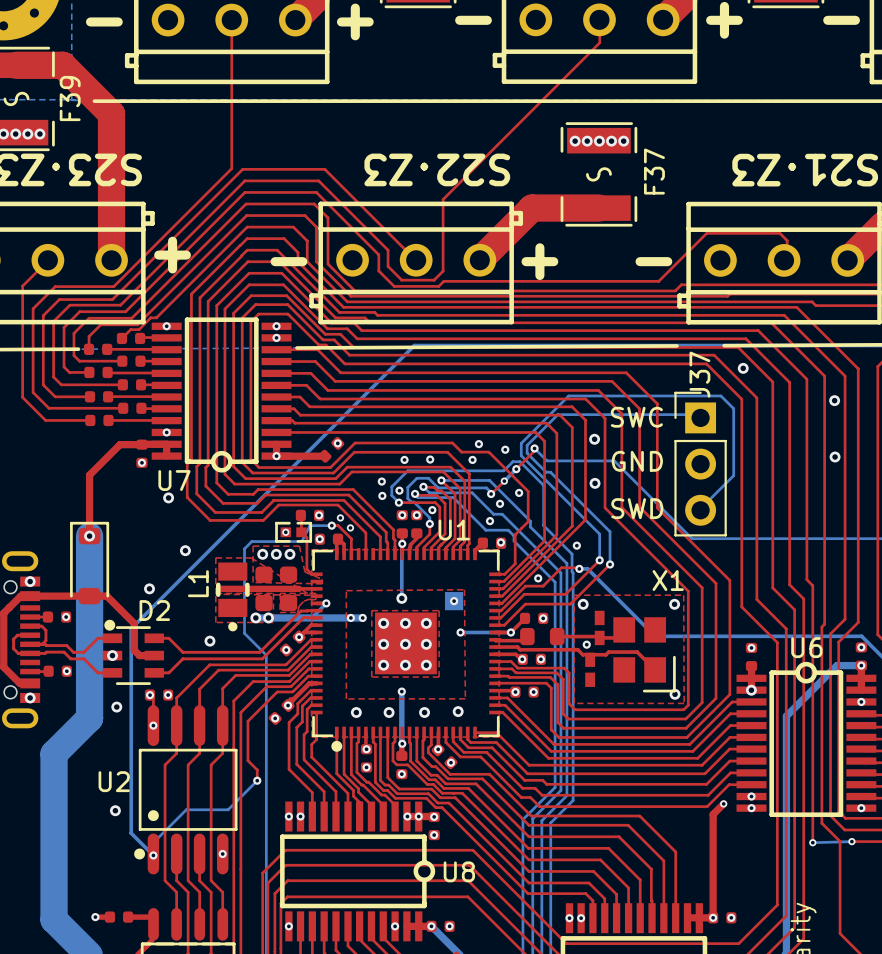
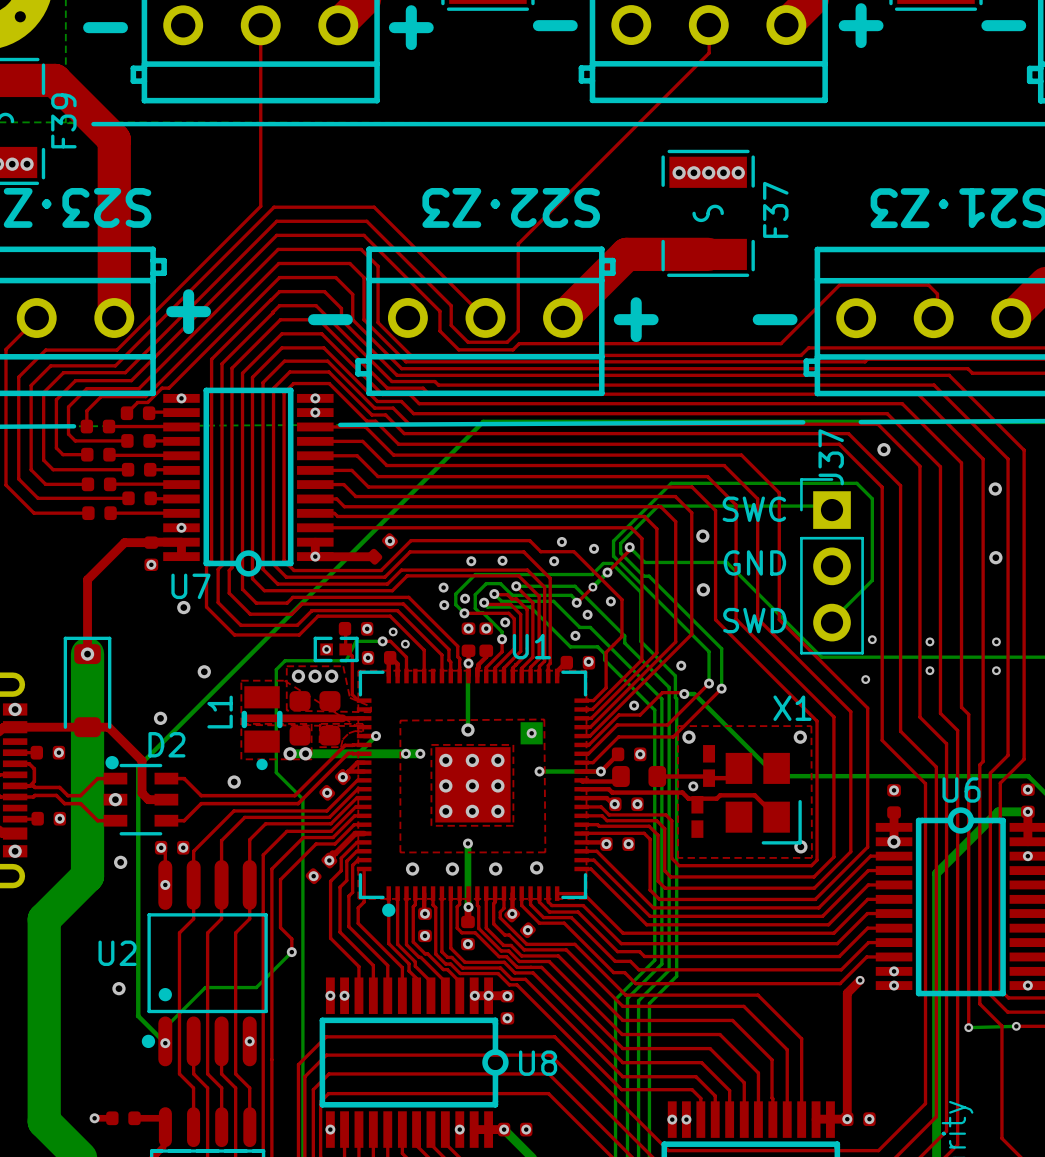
via: none -> (872, 639)
via: none -> (929, 641)
via: none -> (996, 641)
via: none -> (929, 670)
via: none -> (996, 670)
via: none -> (865, 679)

